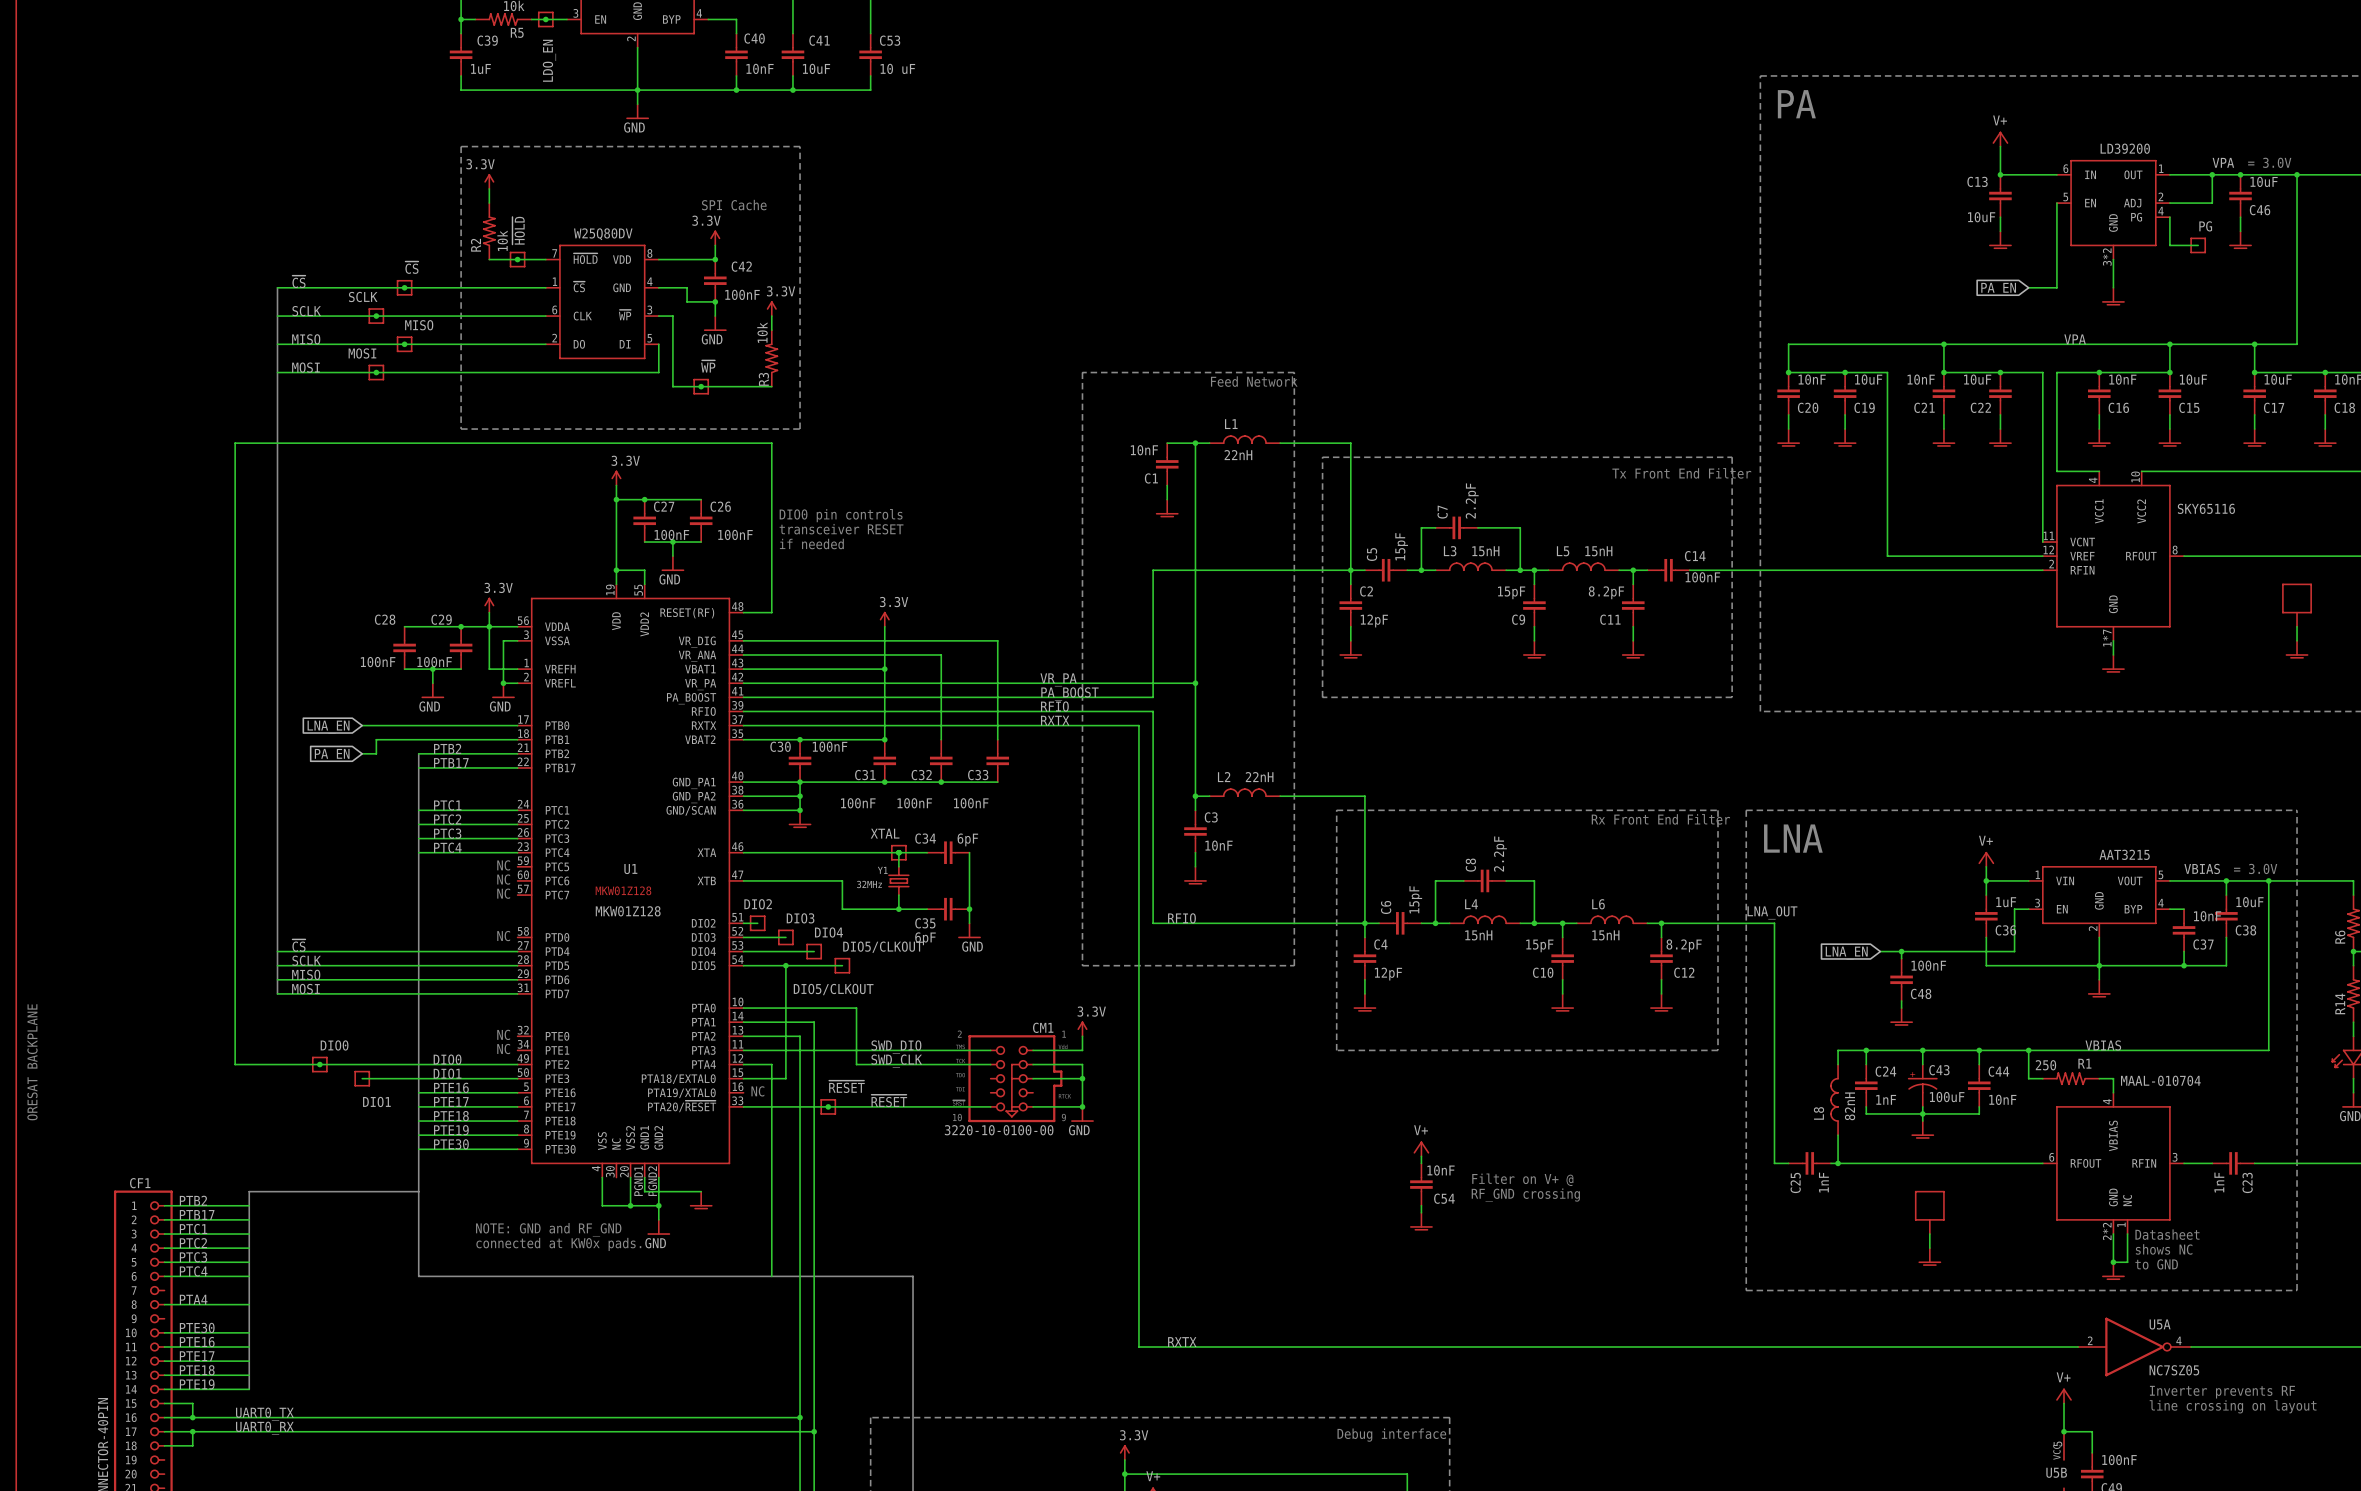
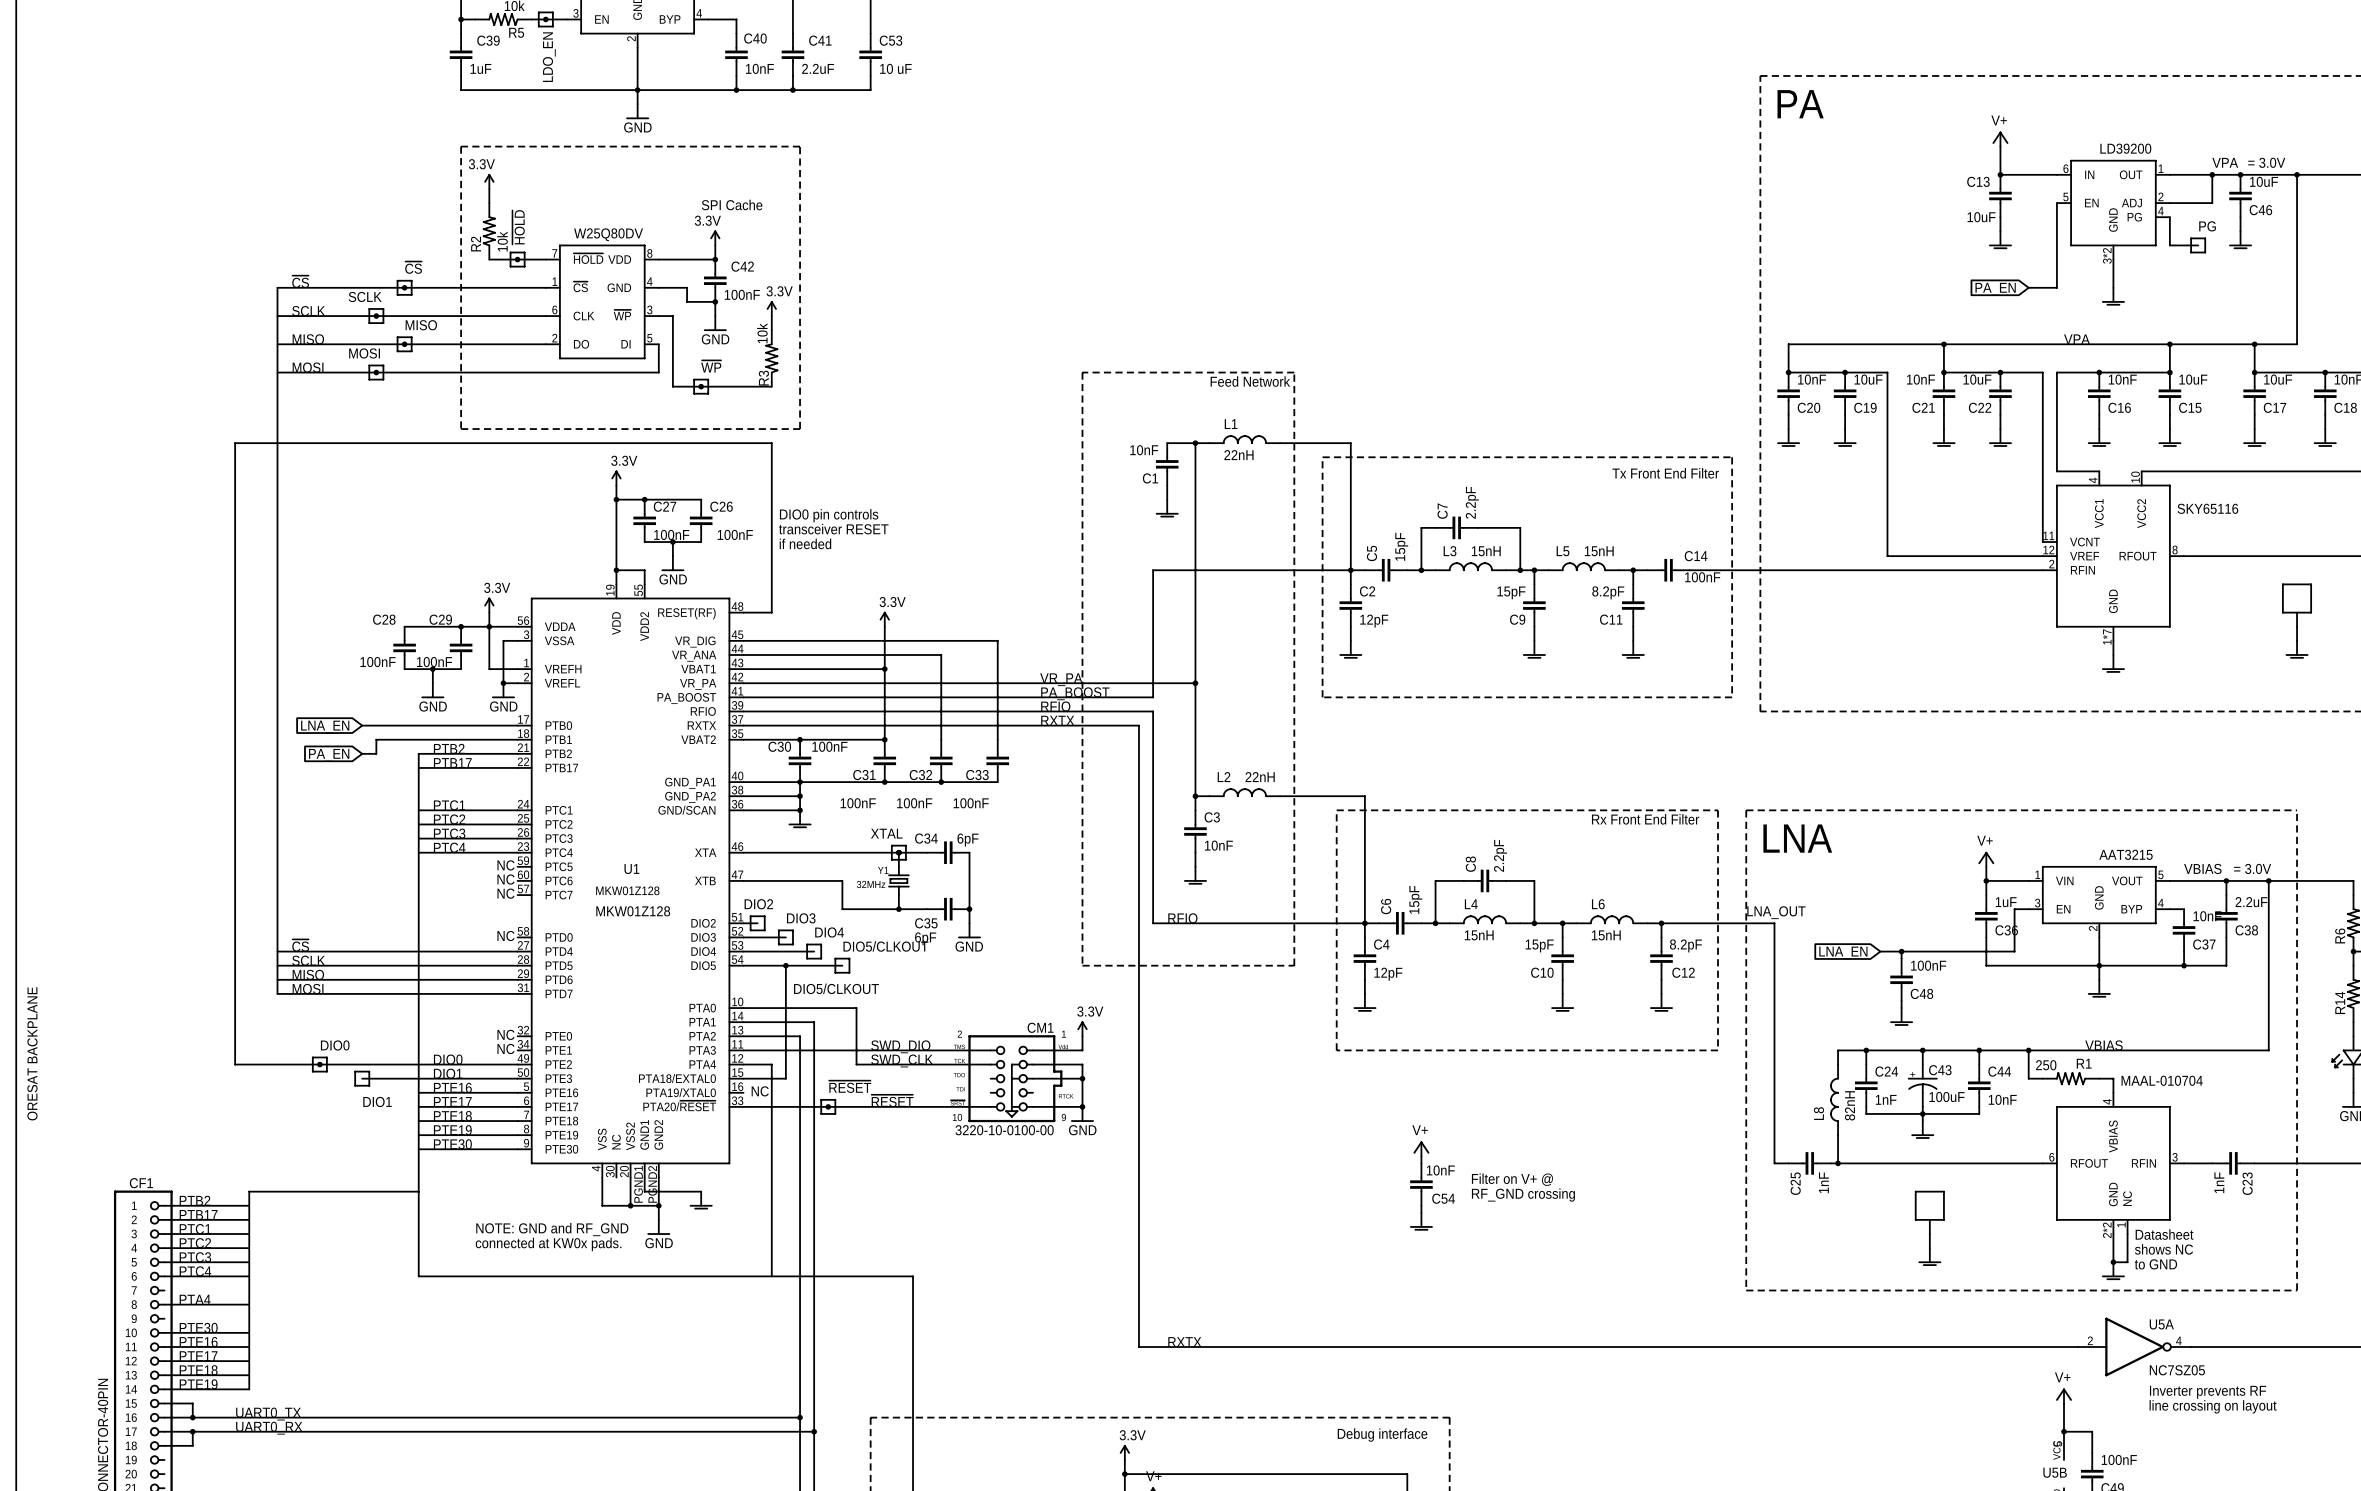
C41 value: 10uF (816, 68) -> 2.2uF (818, 68)
C38 value: 10uF (2249, 902) -> 2.2uF (2251, 902)

